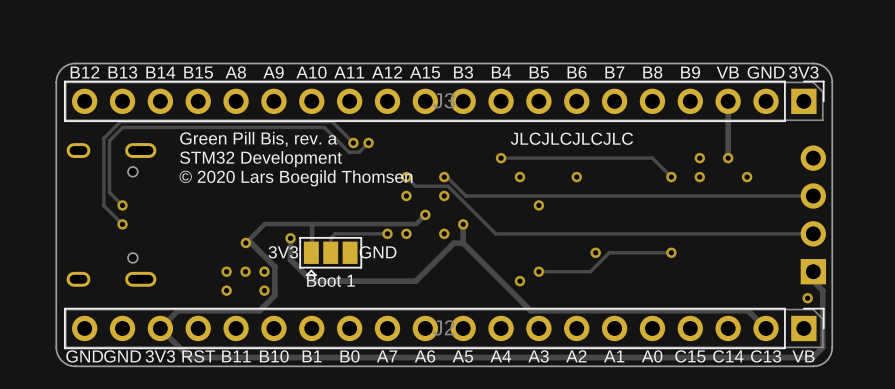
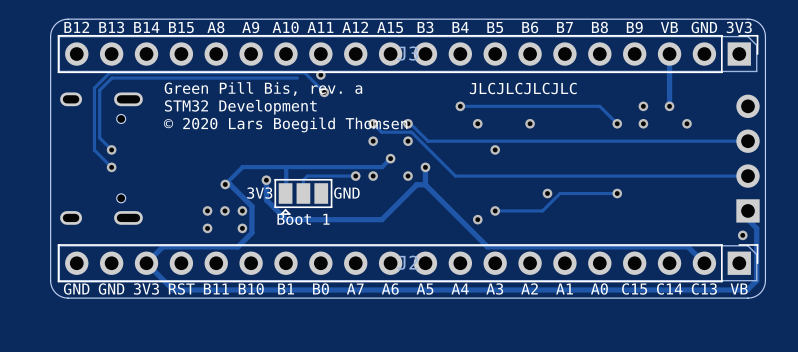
track: (324, 127) (349, 152) (359, 152) (368, 142) -> none
via position: (368, 142) -> (320, 74)

